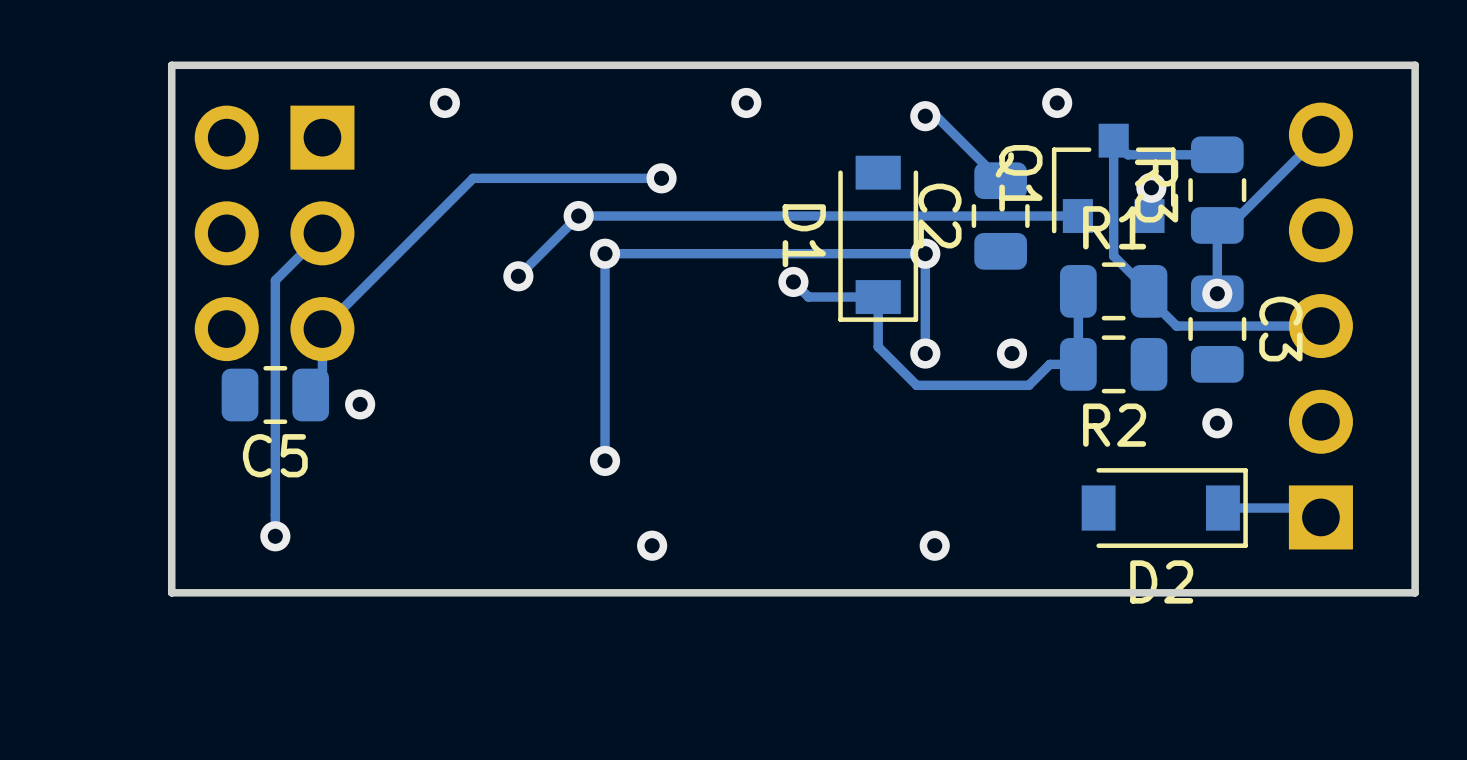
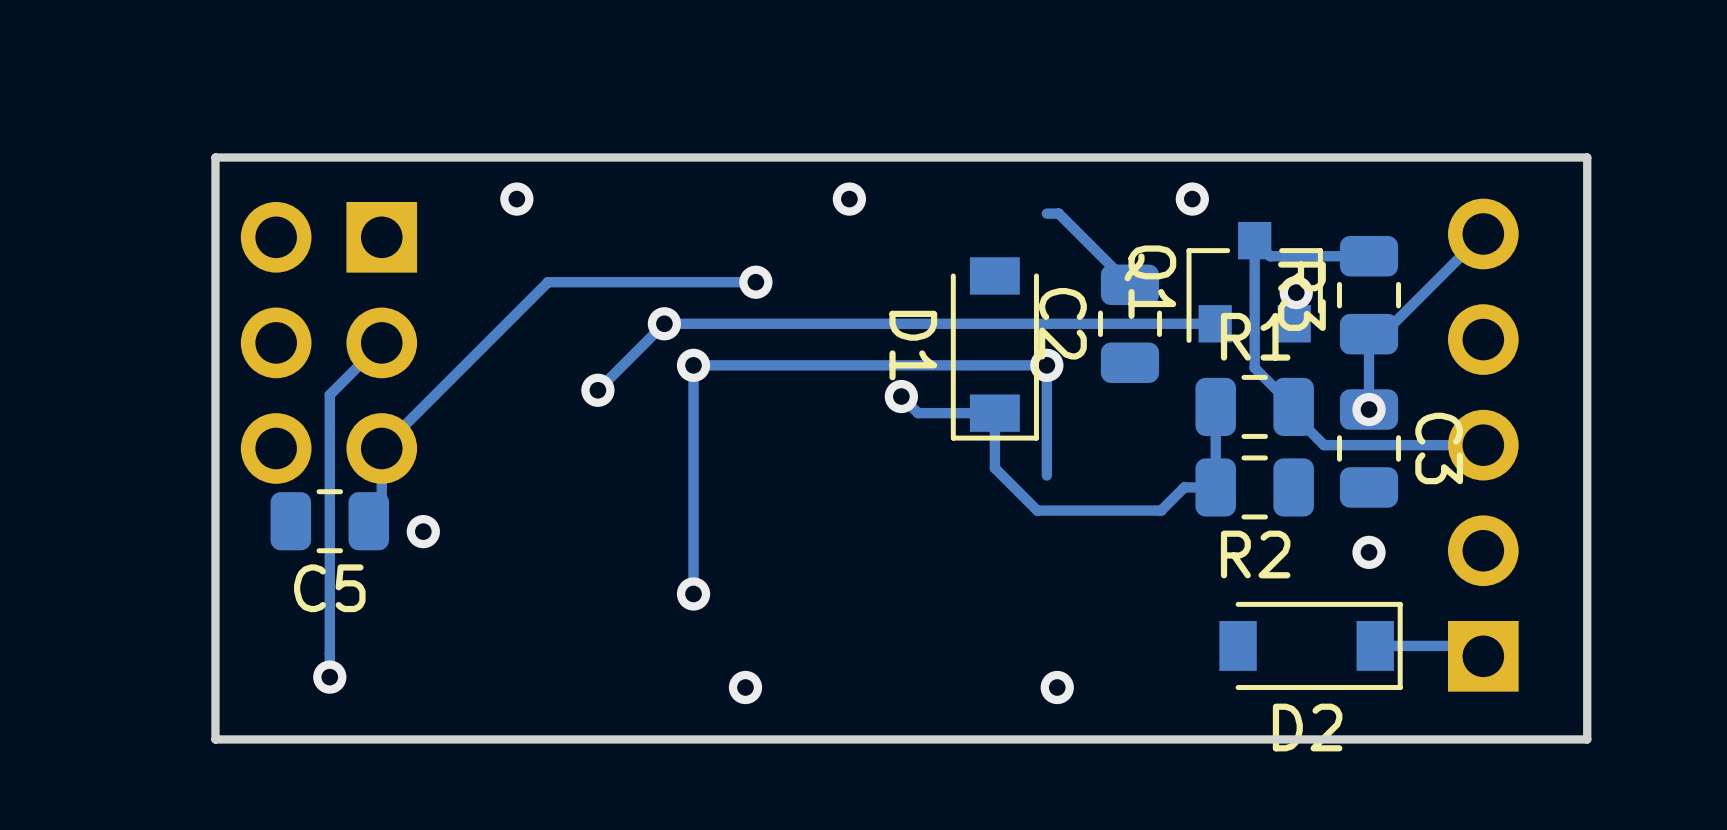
via: (925, 116) -> none
via: (925, 353) -> none
via: (1011, 353) -> none

